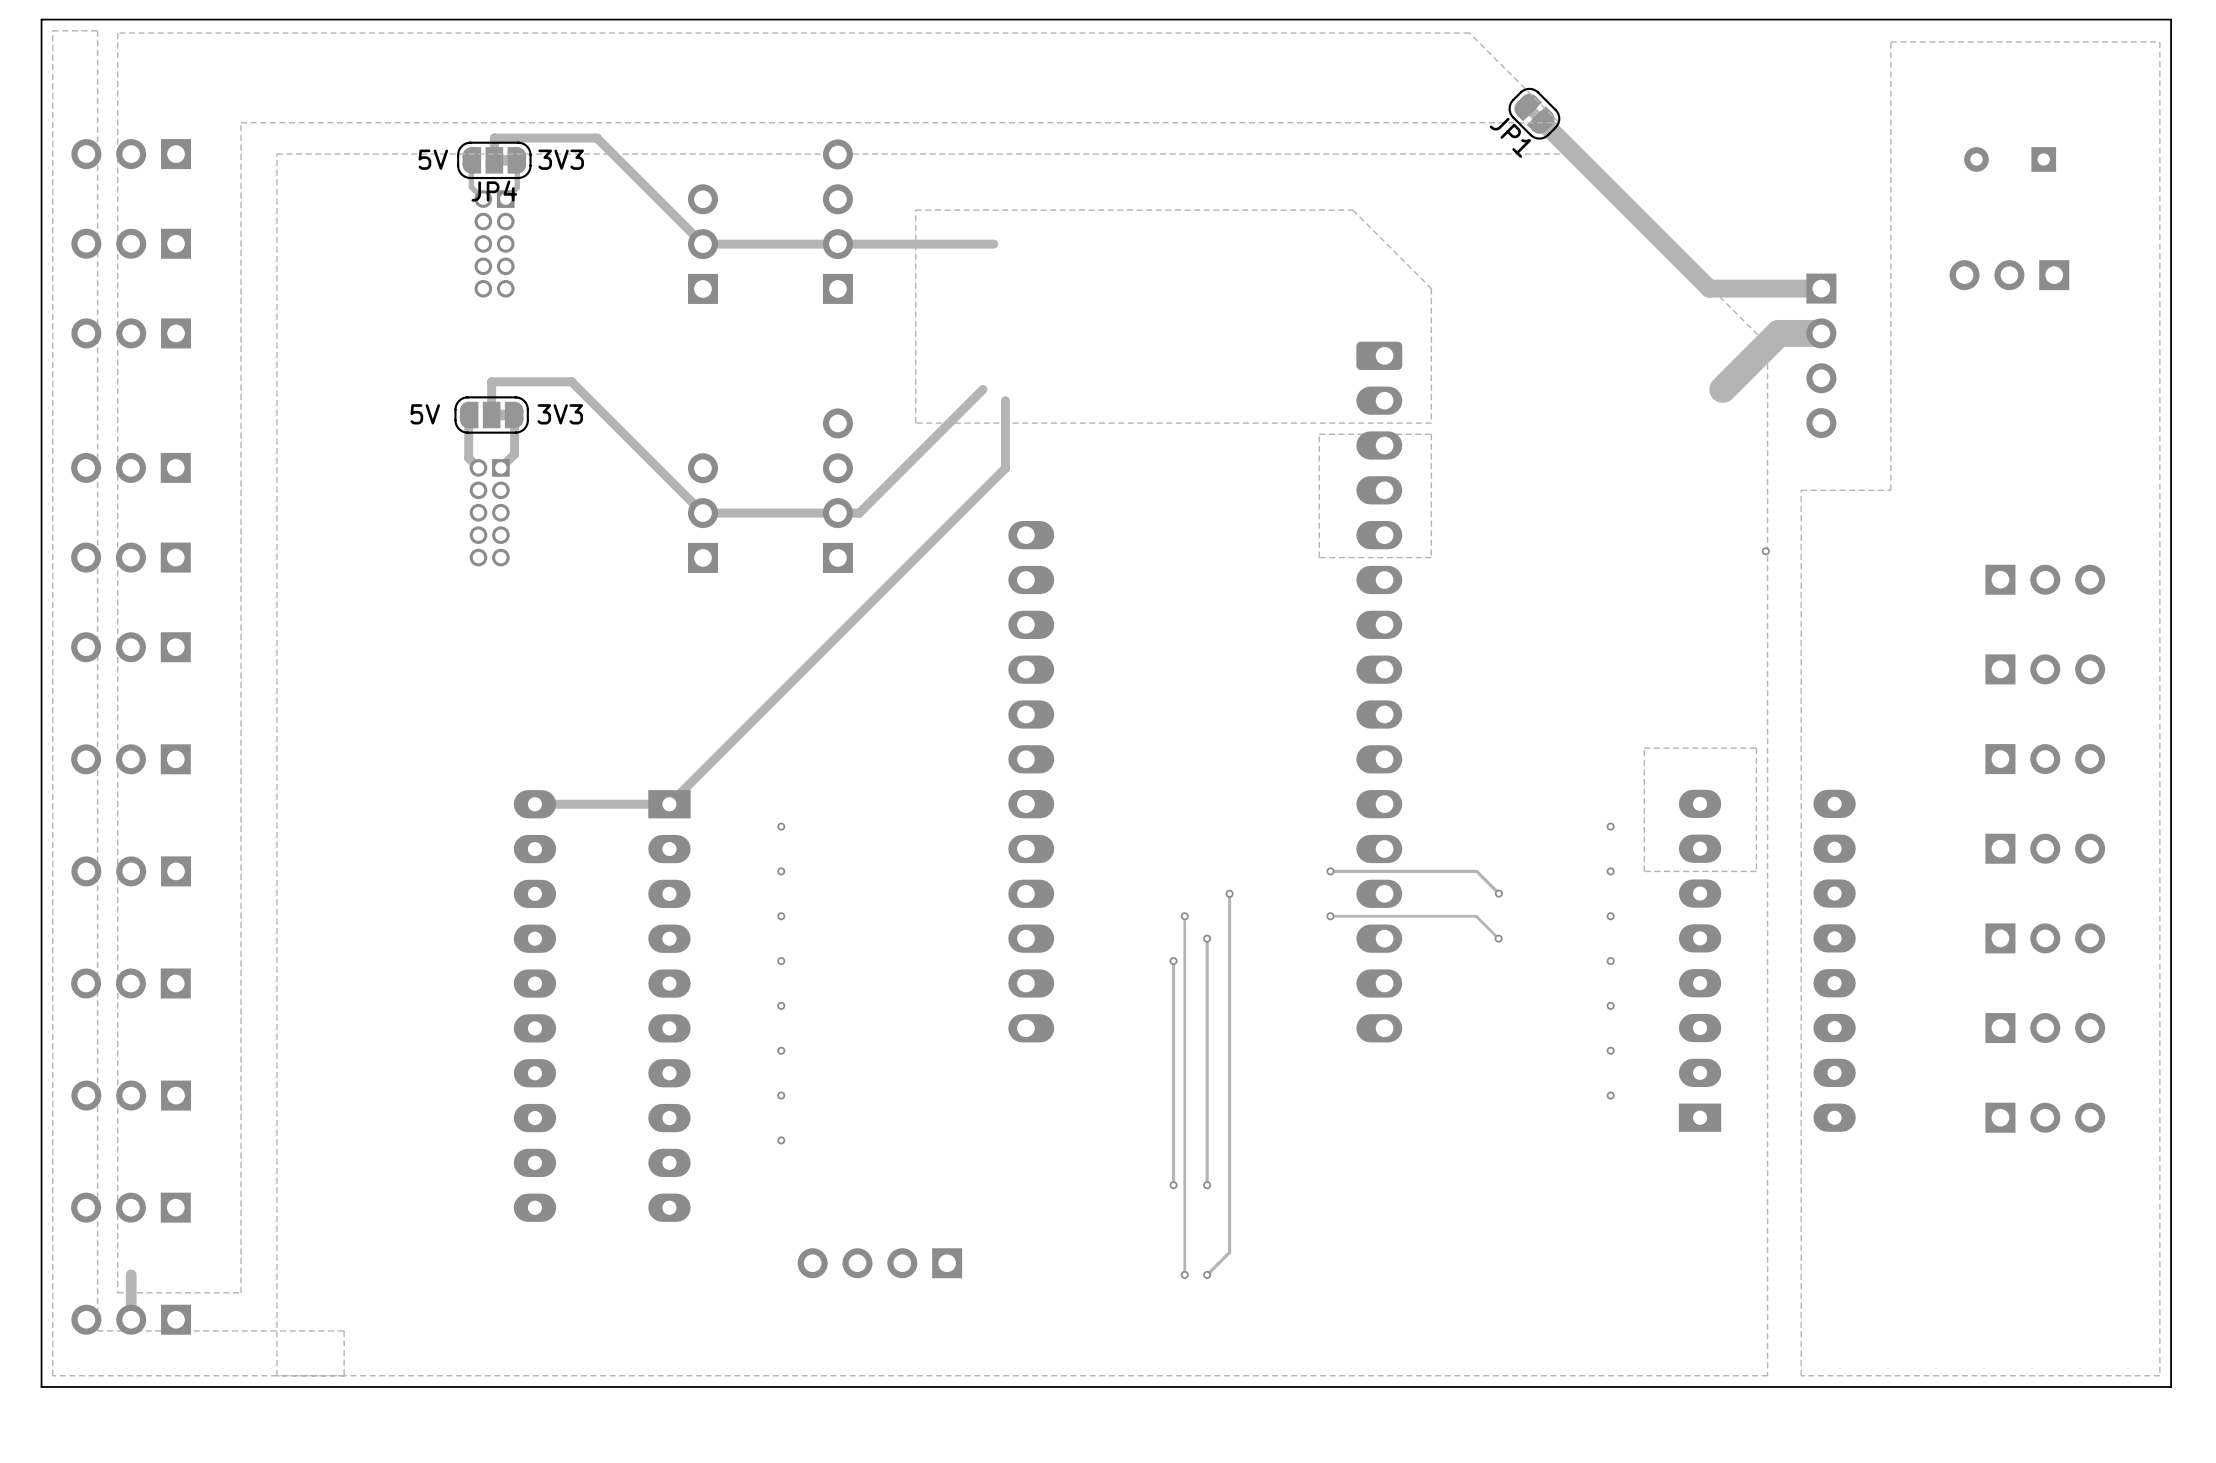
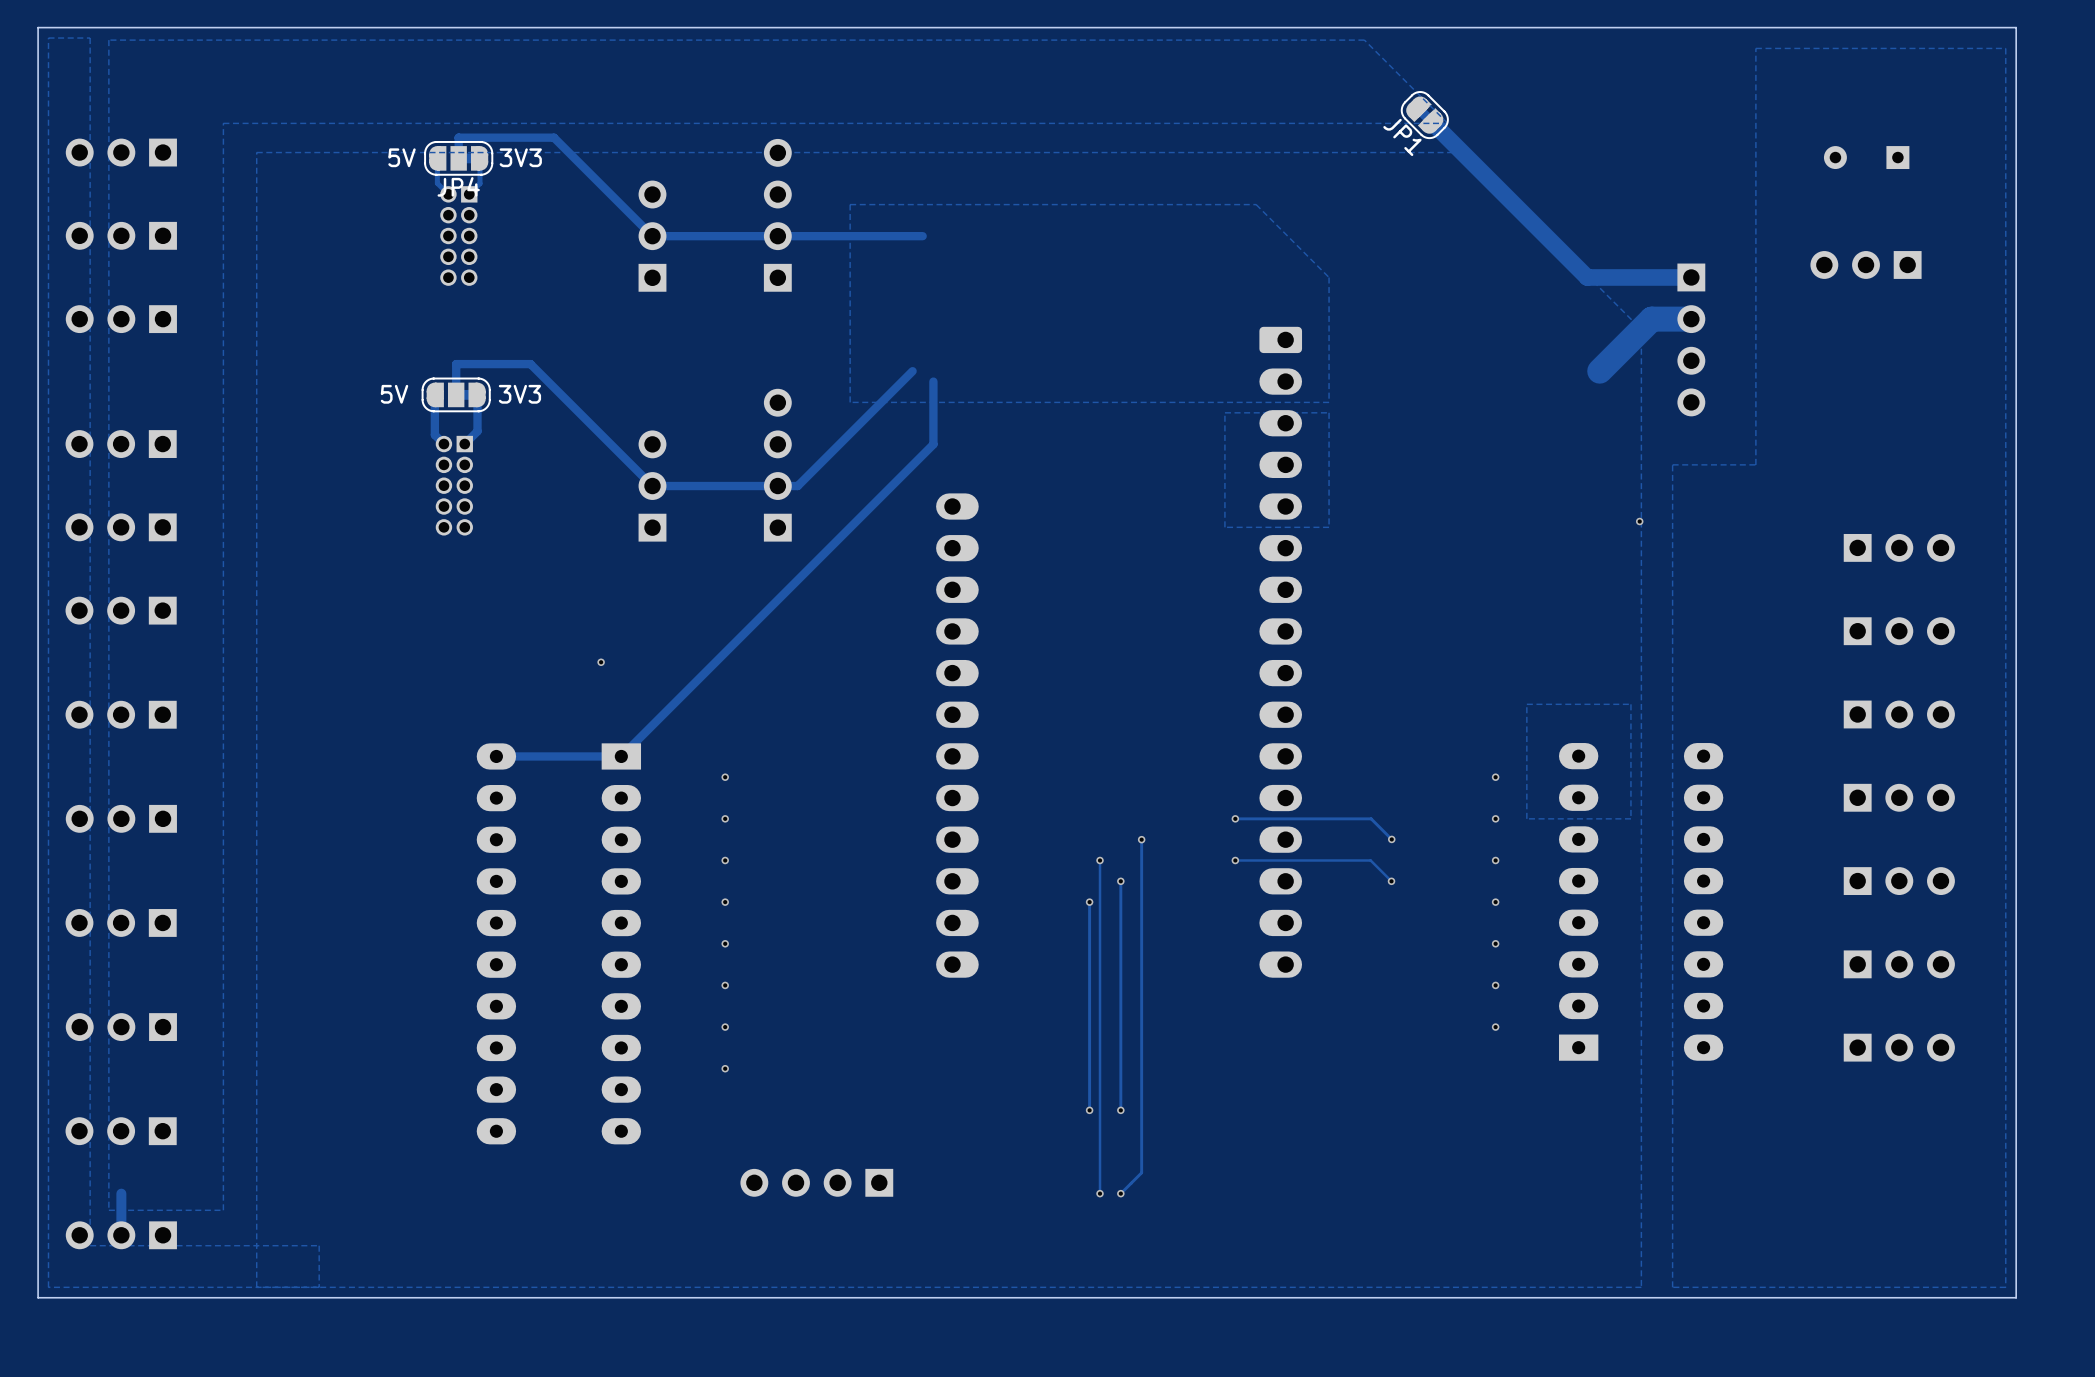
via: none -> (601, 662)

